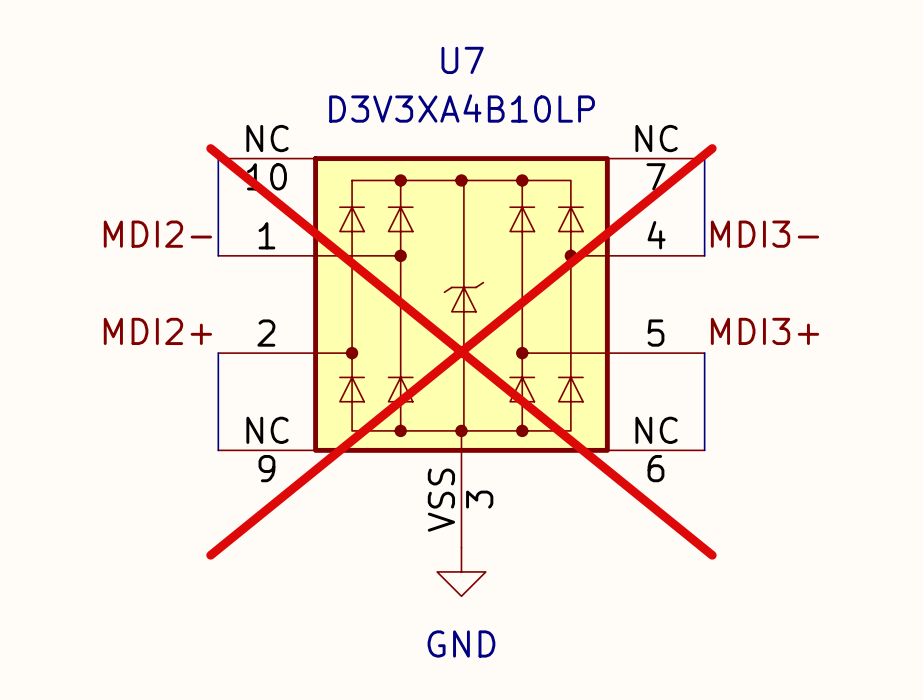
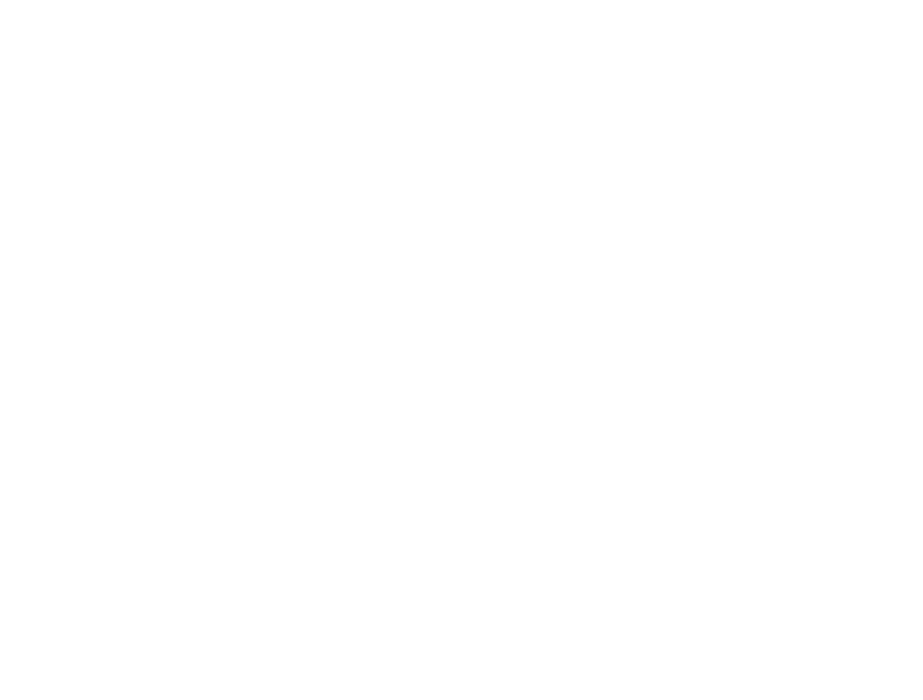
wire: (218, 158) (218, 255) -> none
wire: (704, 158) (704, 255) -> none
label: MDI2- (157, 234) -> none
label: MDI3- (765, 234) -> none
label: MDI2+ (157, 331) -> none
label: MDI3+ (765, 331) -> none
U7: D3V3XA4B10LP (461, 351) -> none
wire: (218, 353) (218, 450) -> none
wire: (704, 353) (704, 450) -> none
power symbol: GND (461, 571) -> none

